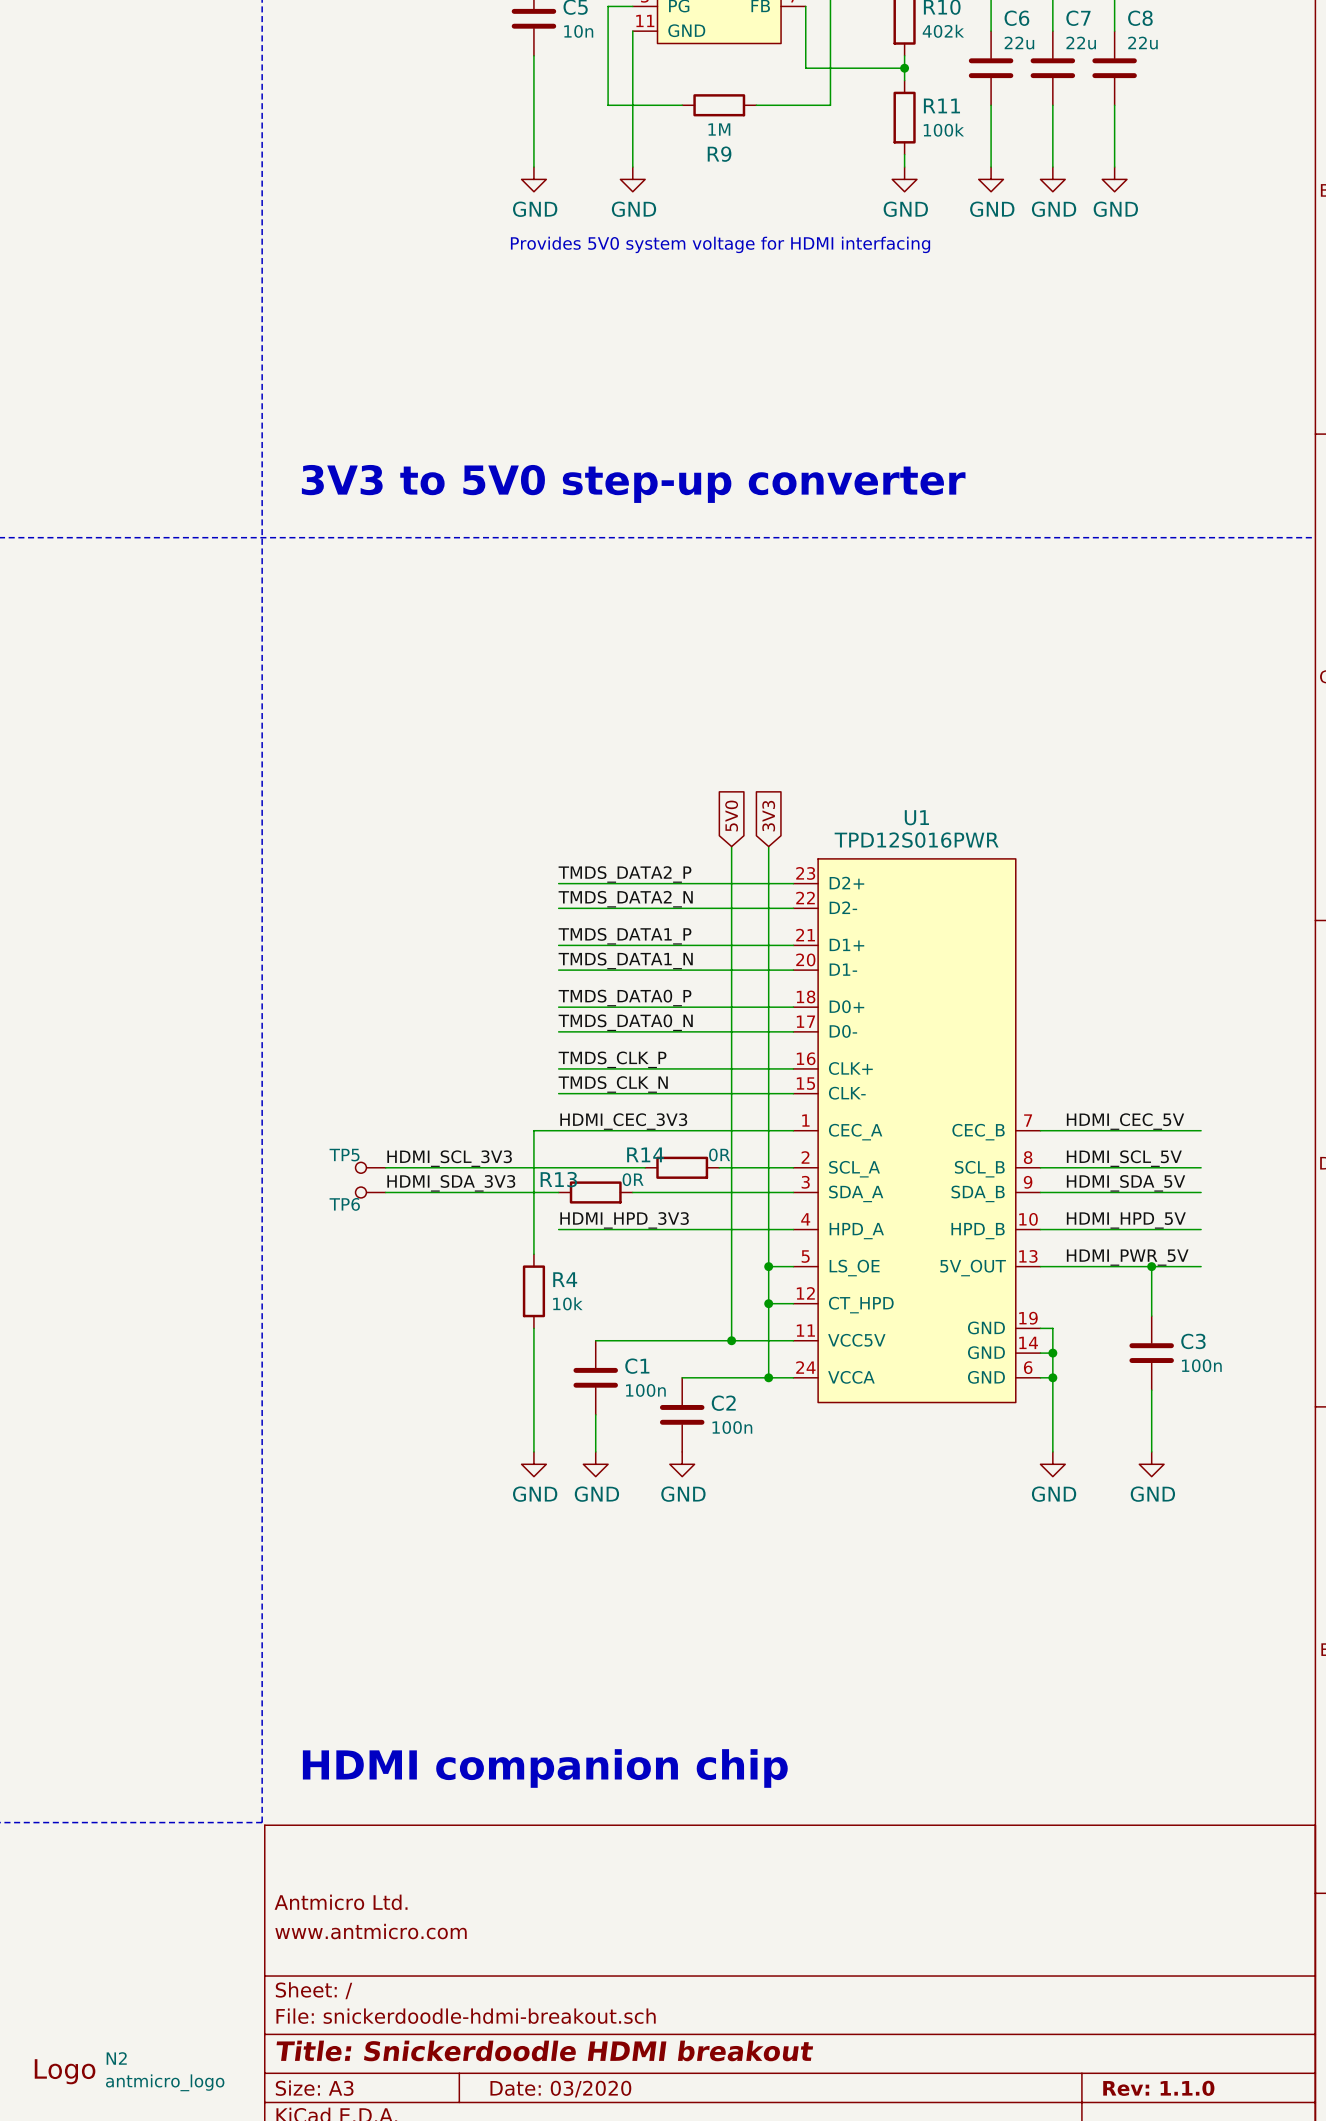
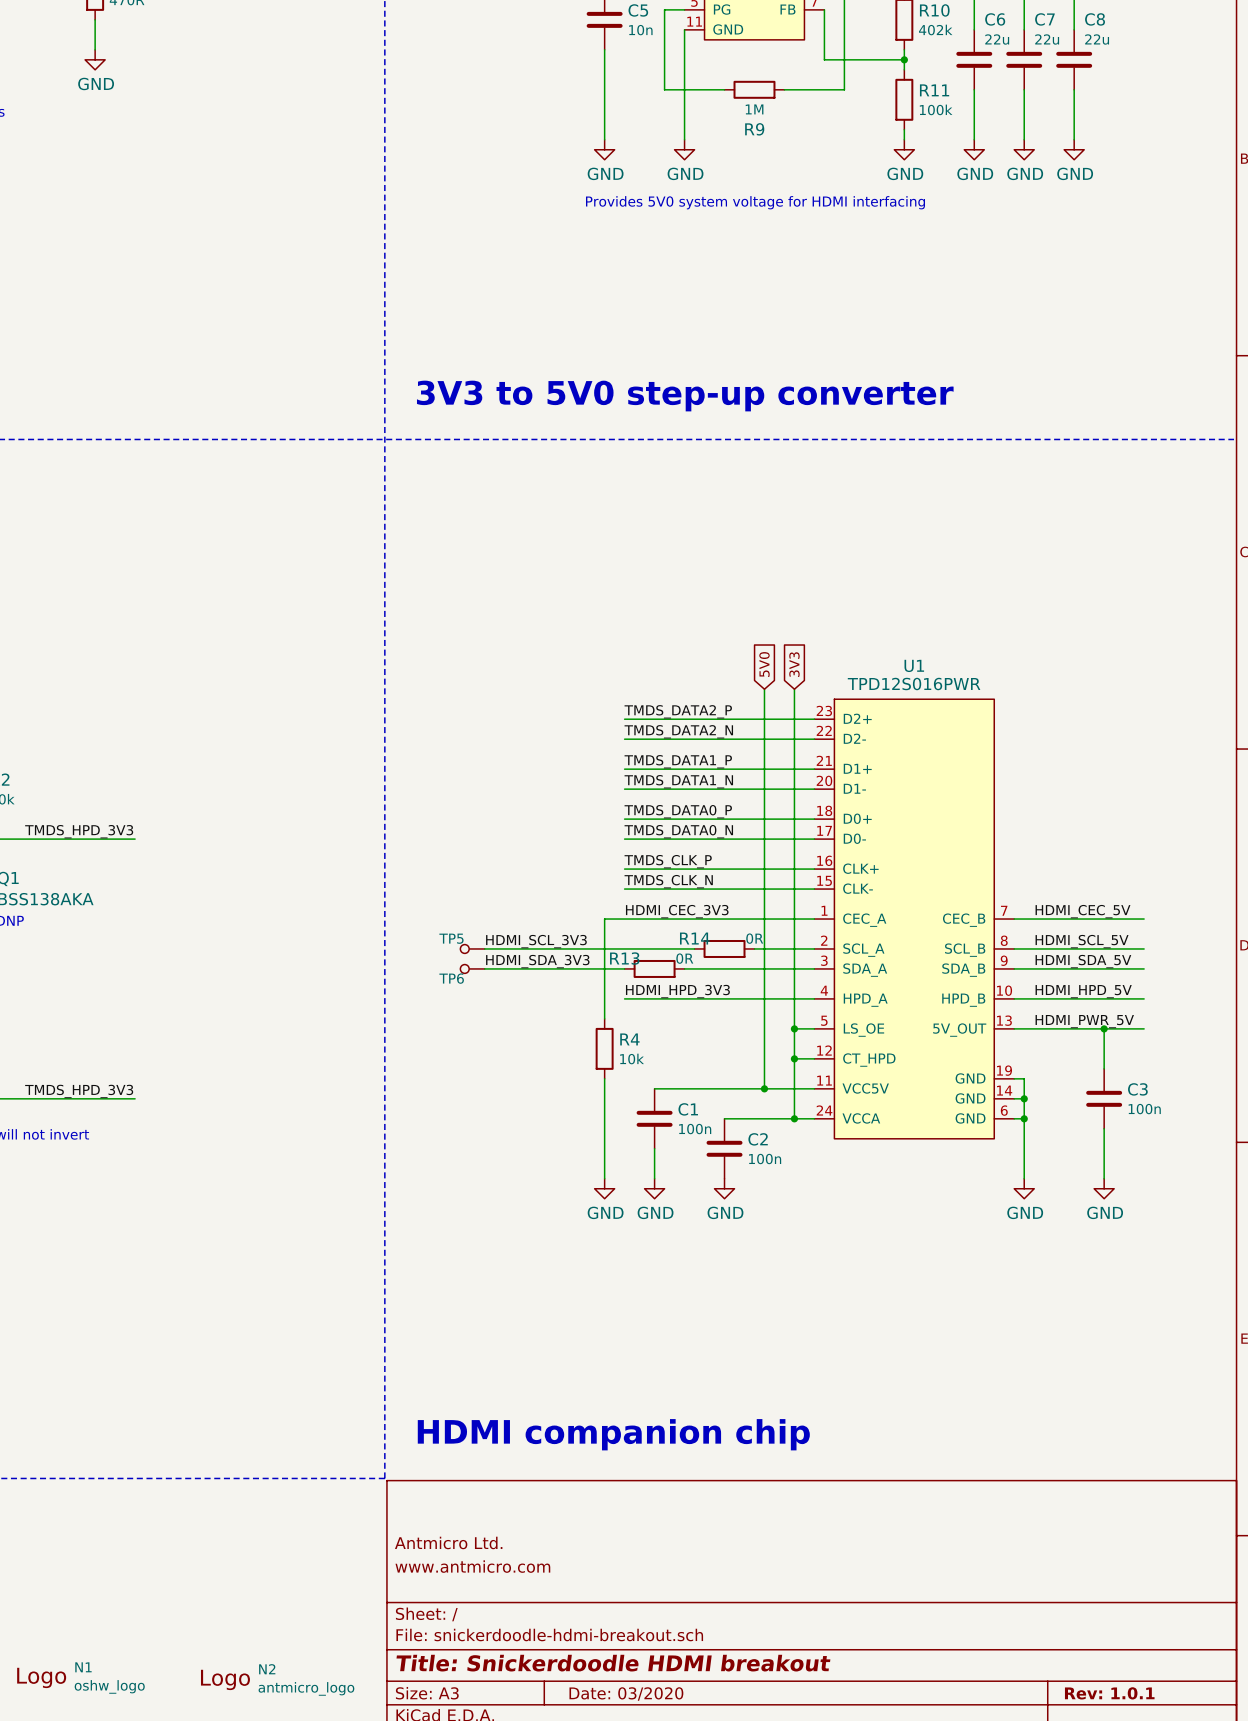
title block: Rev: 1.1.0 (1158, 2088) -> Rev: 1.0.1 (1109, 1693)

